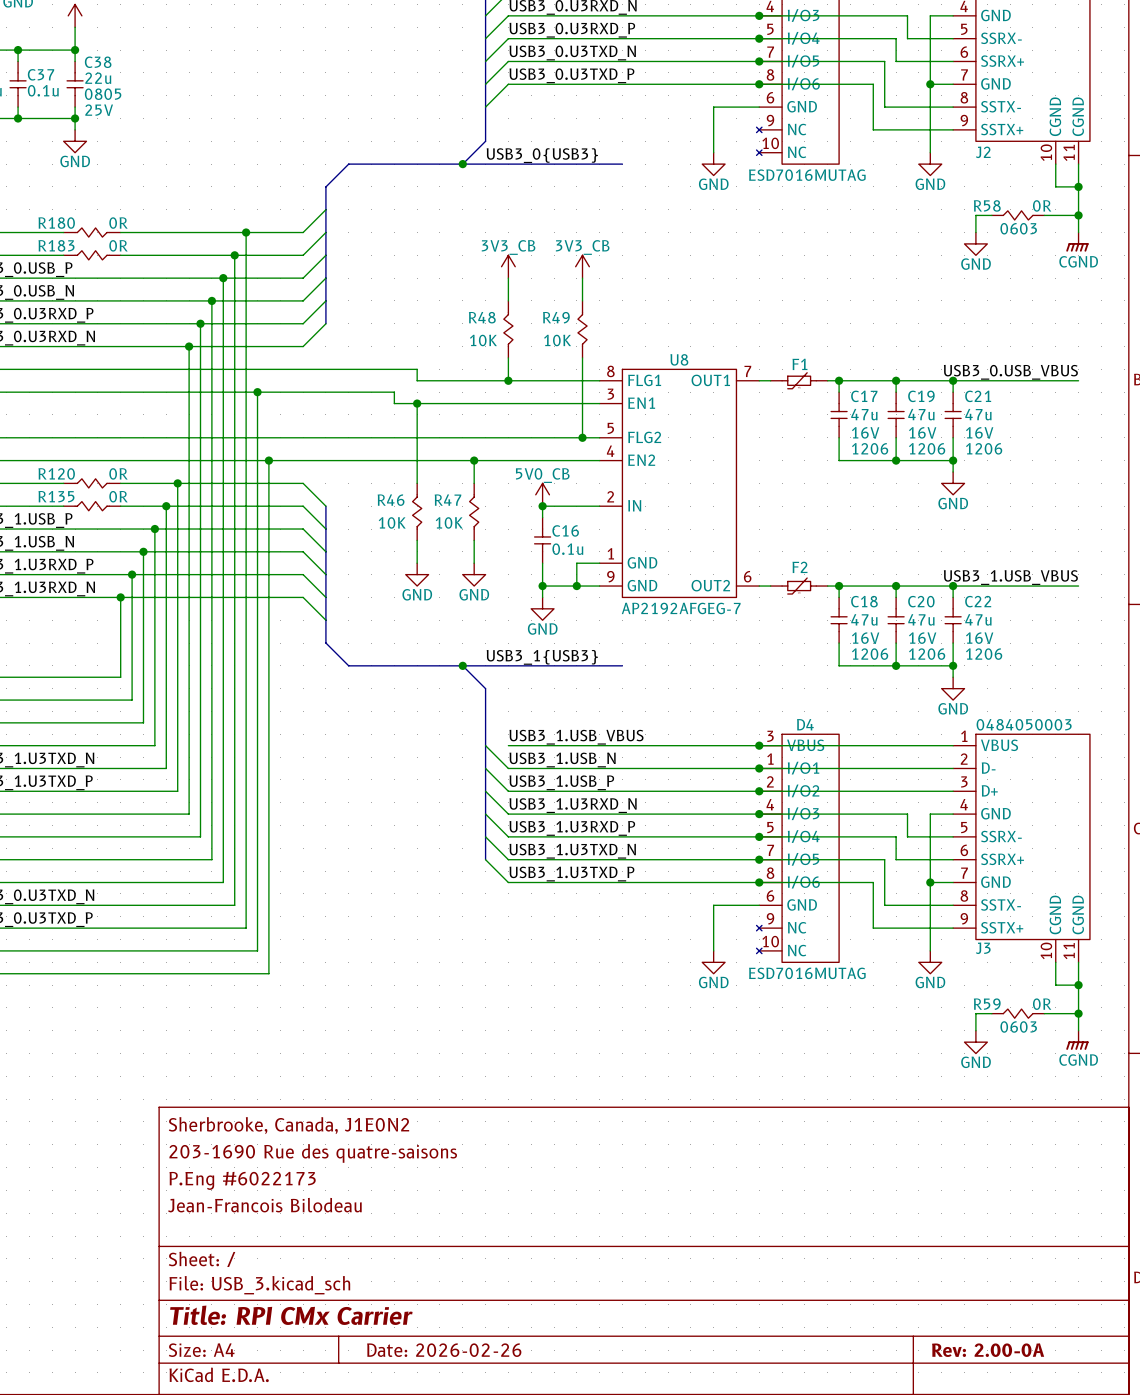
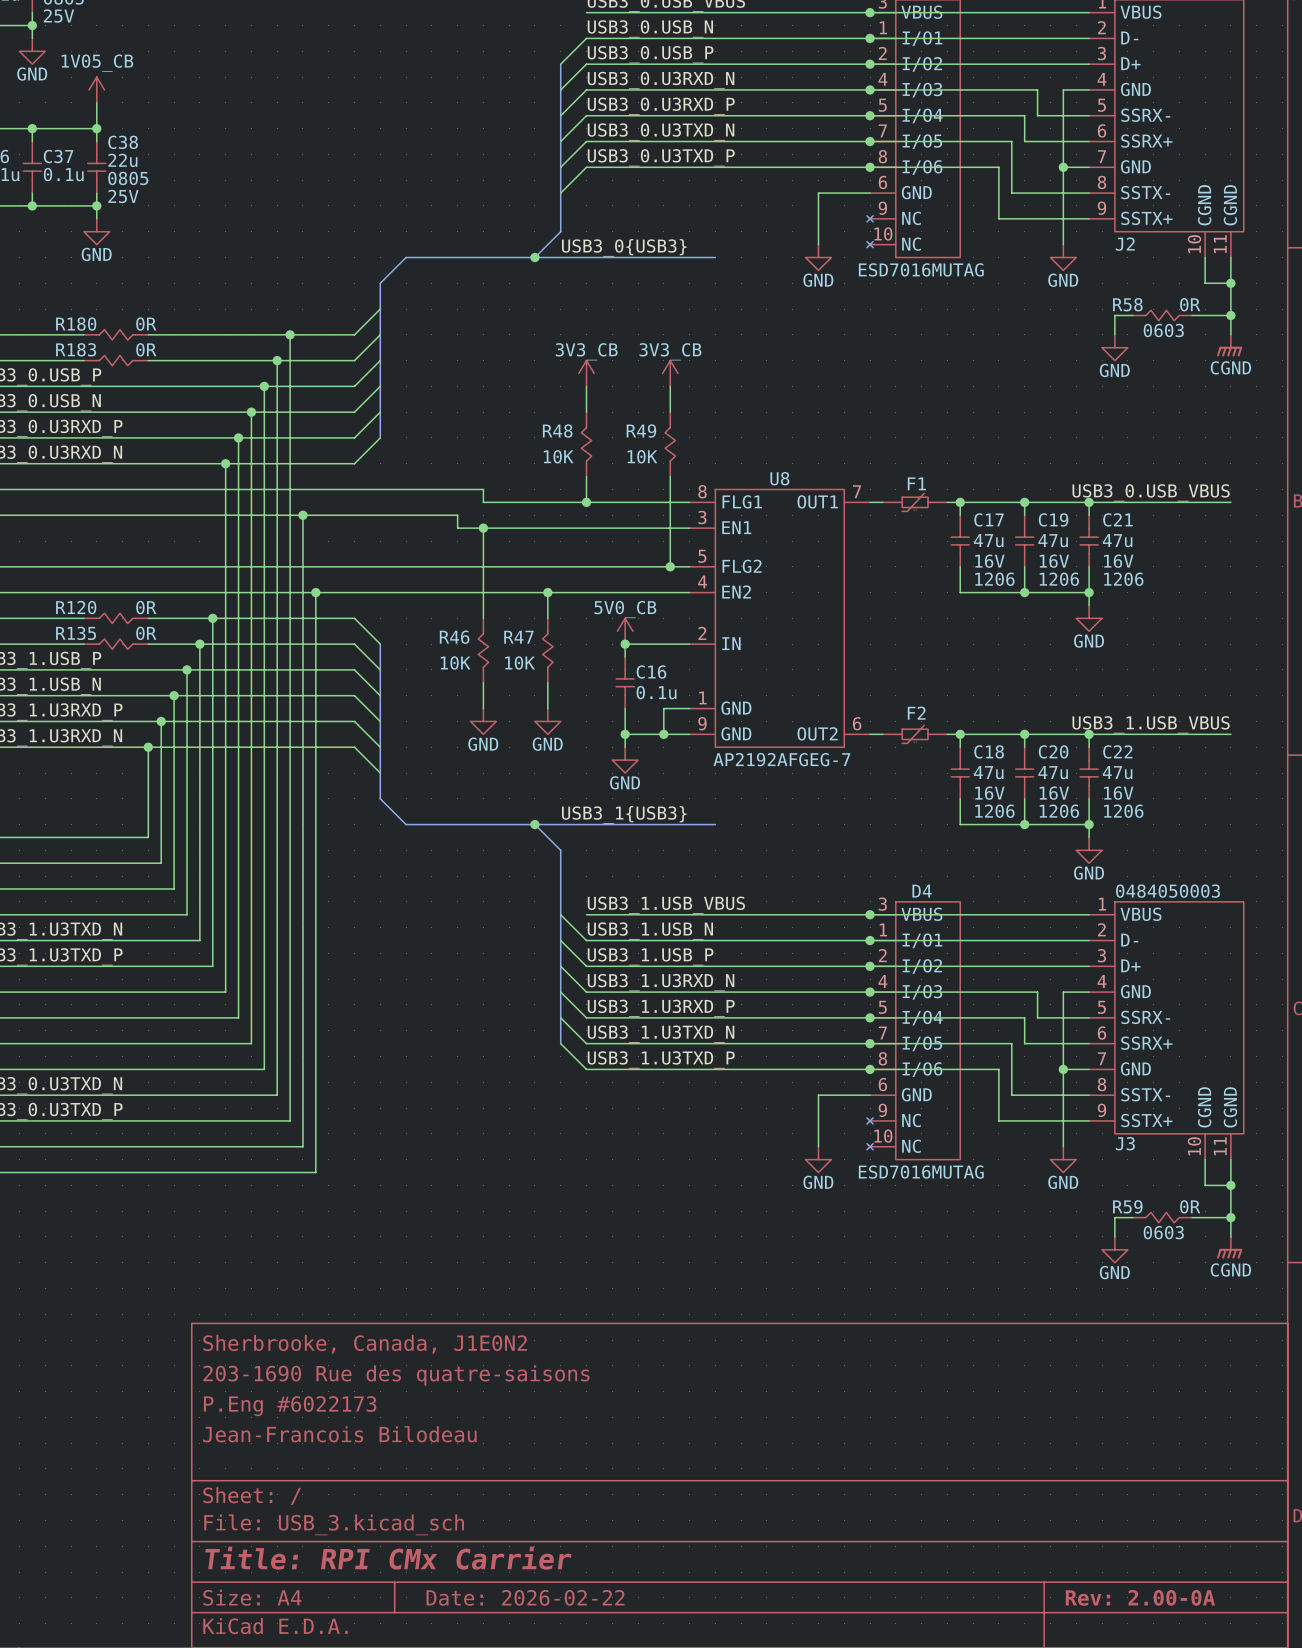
title block: Date: 2026-02-26 (444, 1350) -> Date: 2026-02-22 (525, 1597)

